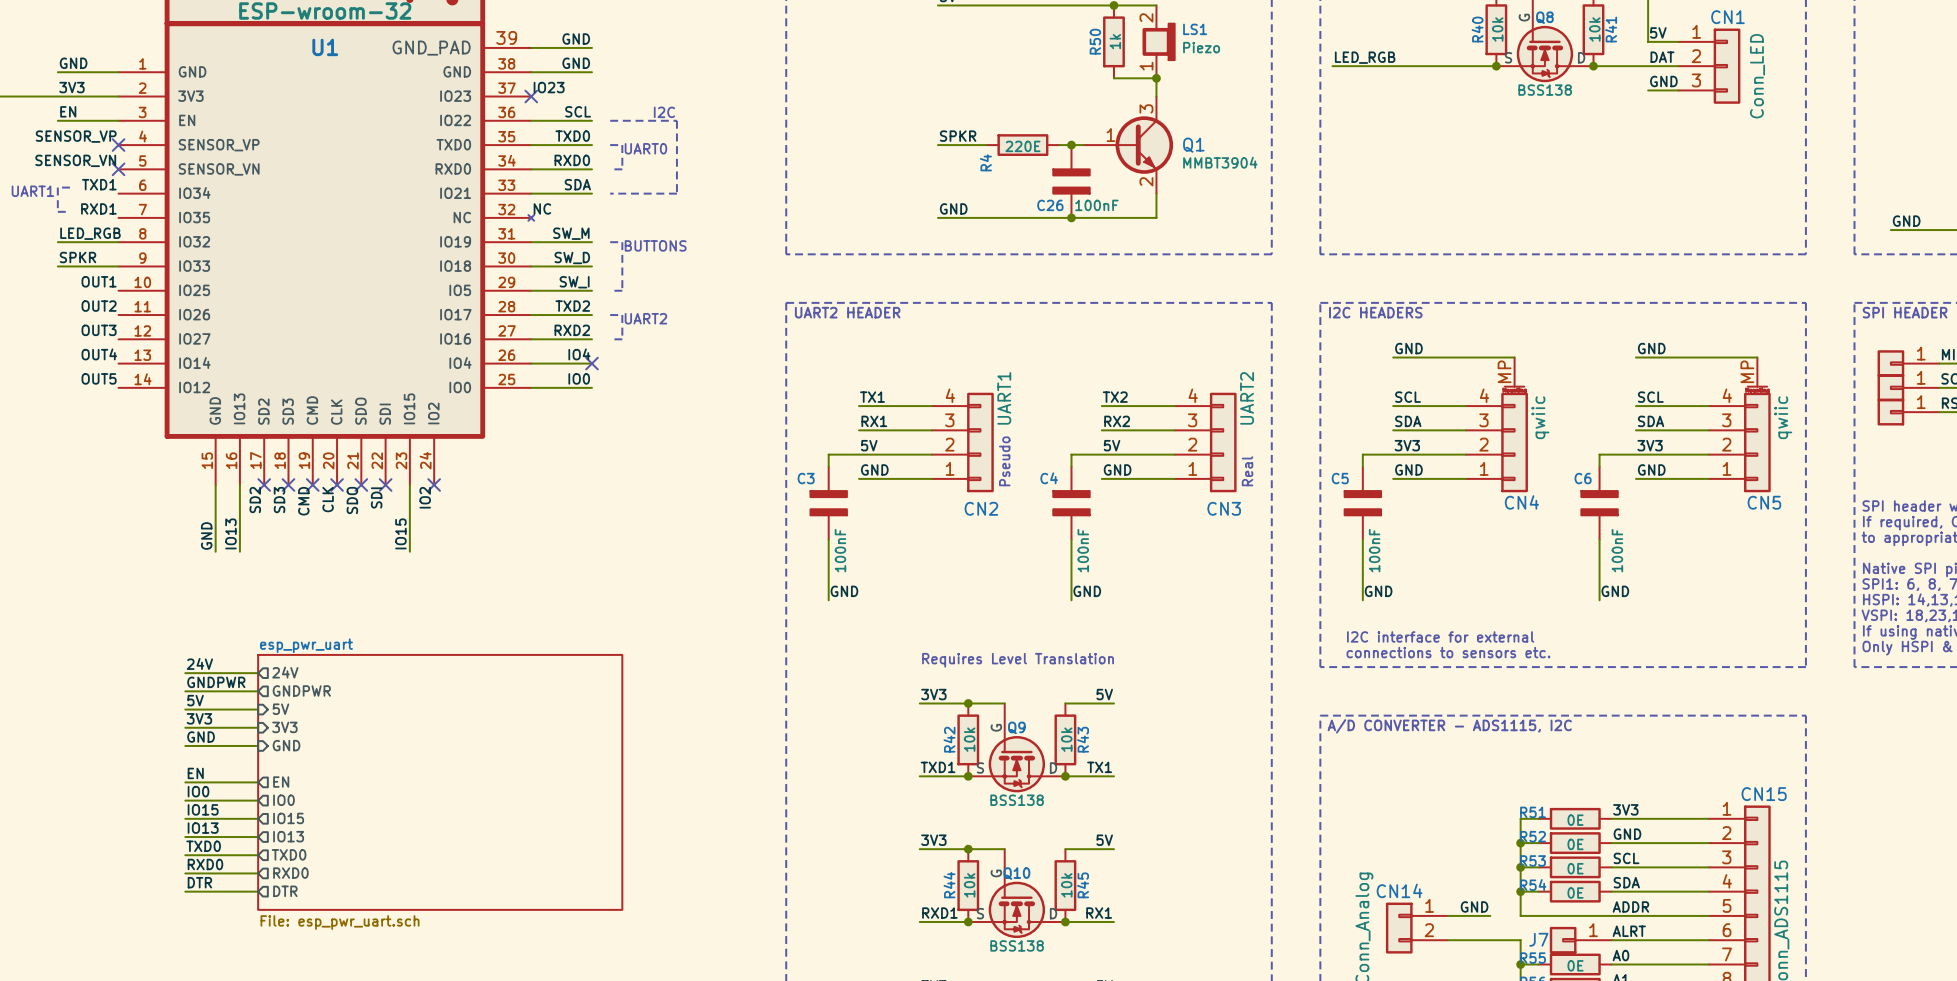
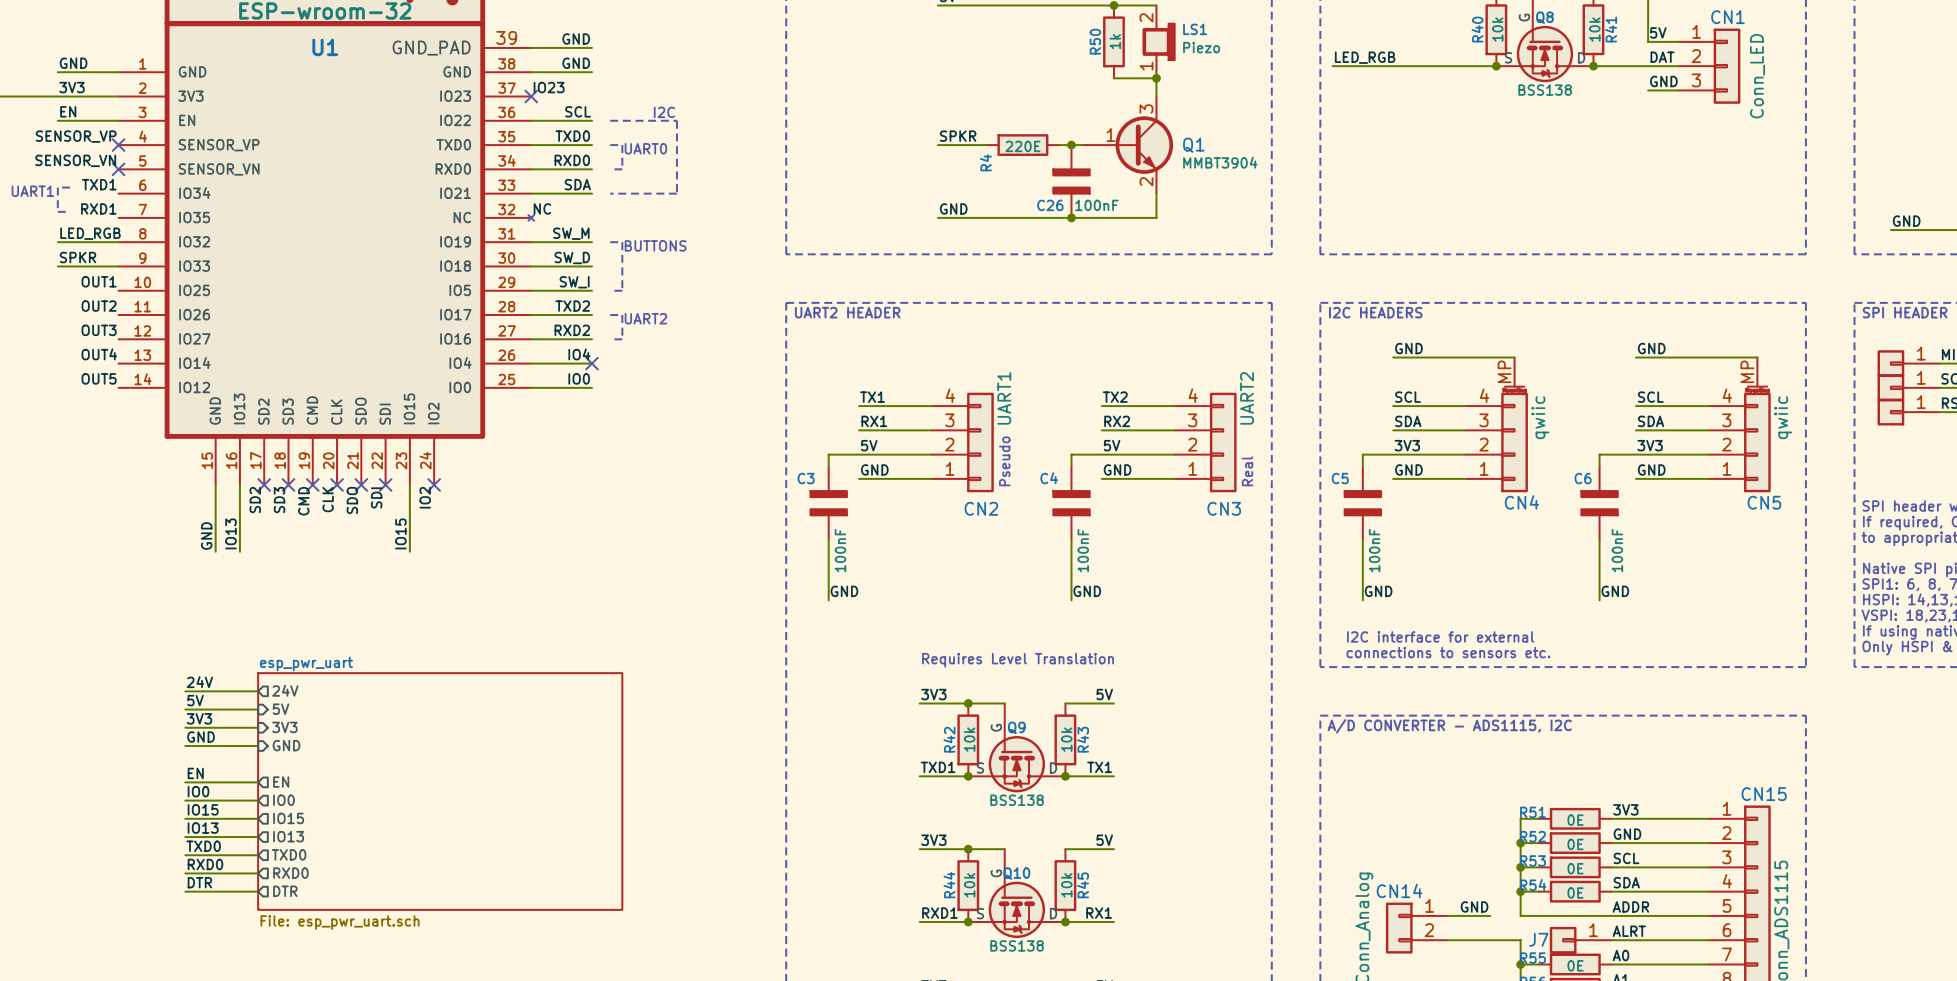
sheet esp_pwr_uart shape: [258, 654, 623, 910] -> [258, 673, 623, 910]
label: 24V (199, 663) -> none
sheet pin: 24V (285, 672) -> none
wire: (185, 673) (258, 673) -> none
label: GNDPWR (216, 682) -> 24V (199, 682)
sheet pin: GNDPWR (301, 690) -> 24V (285, 690)

